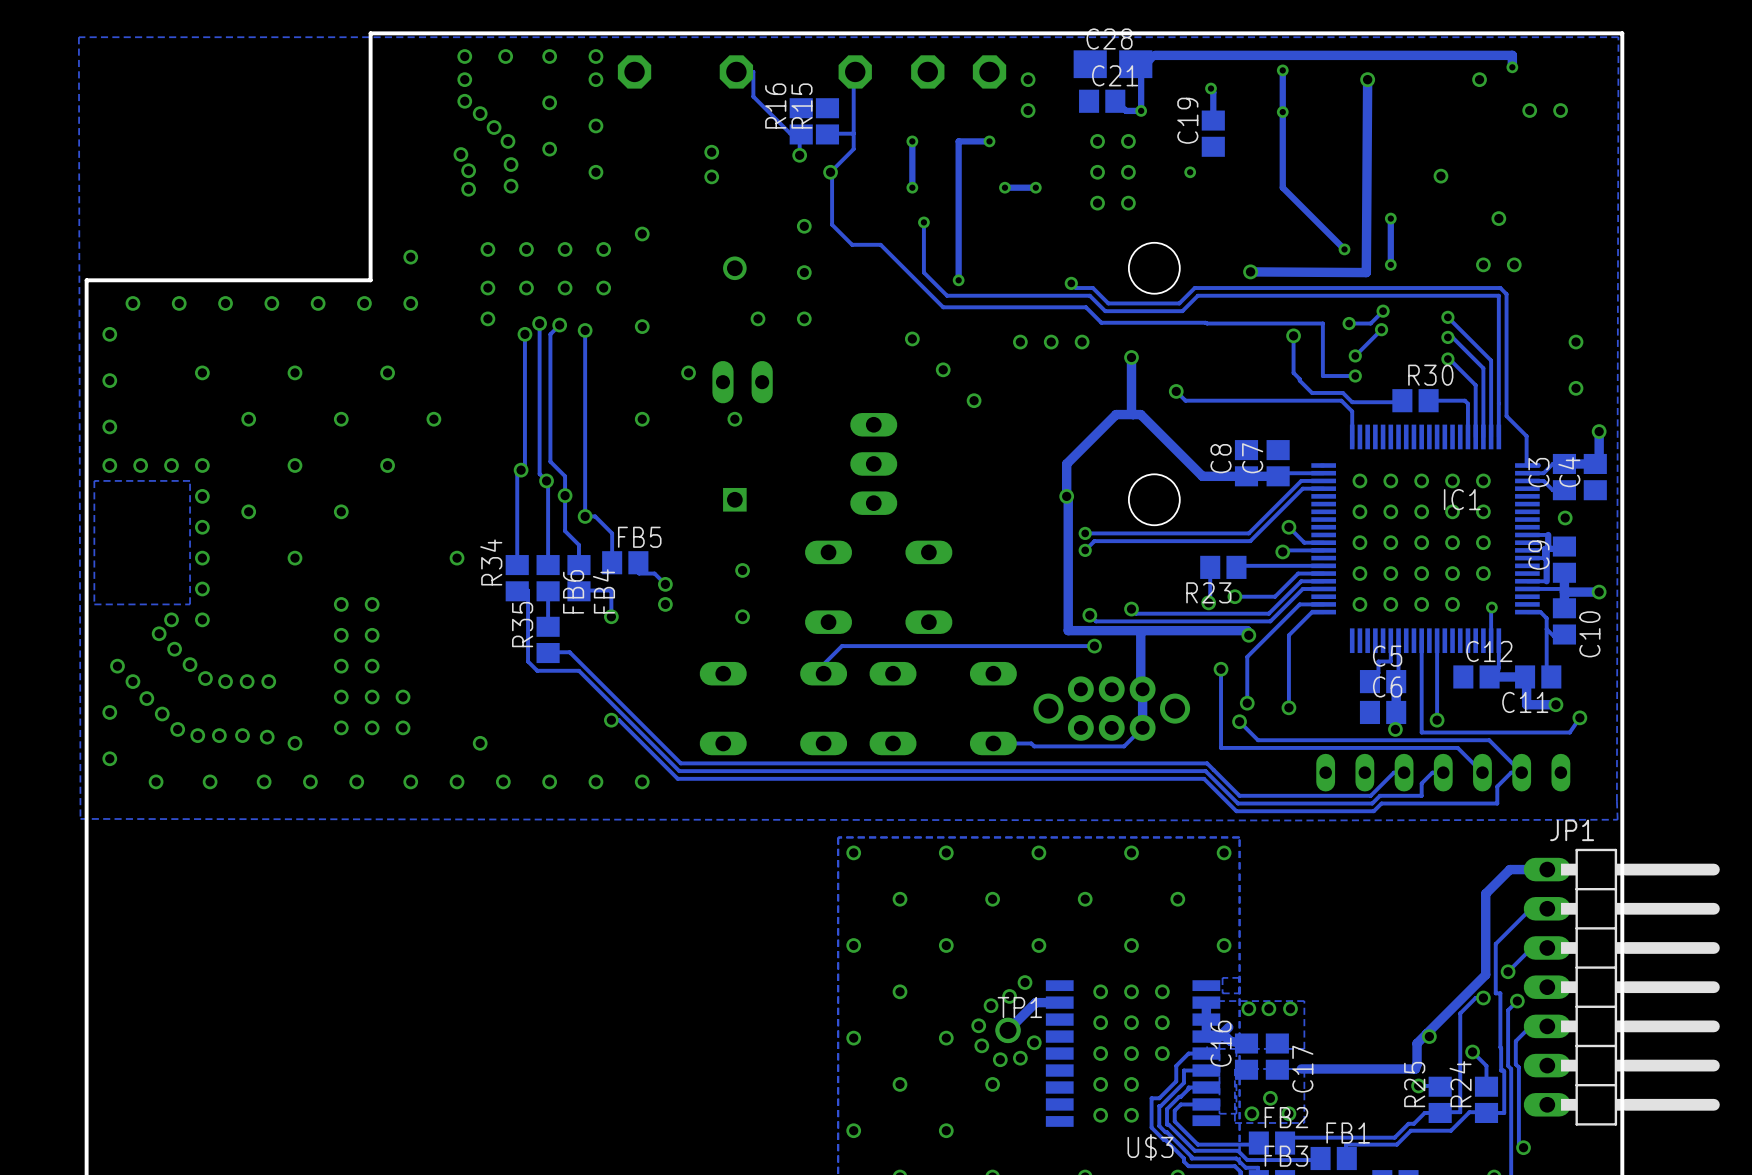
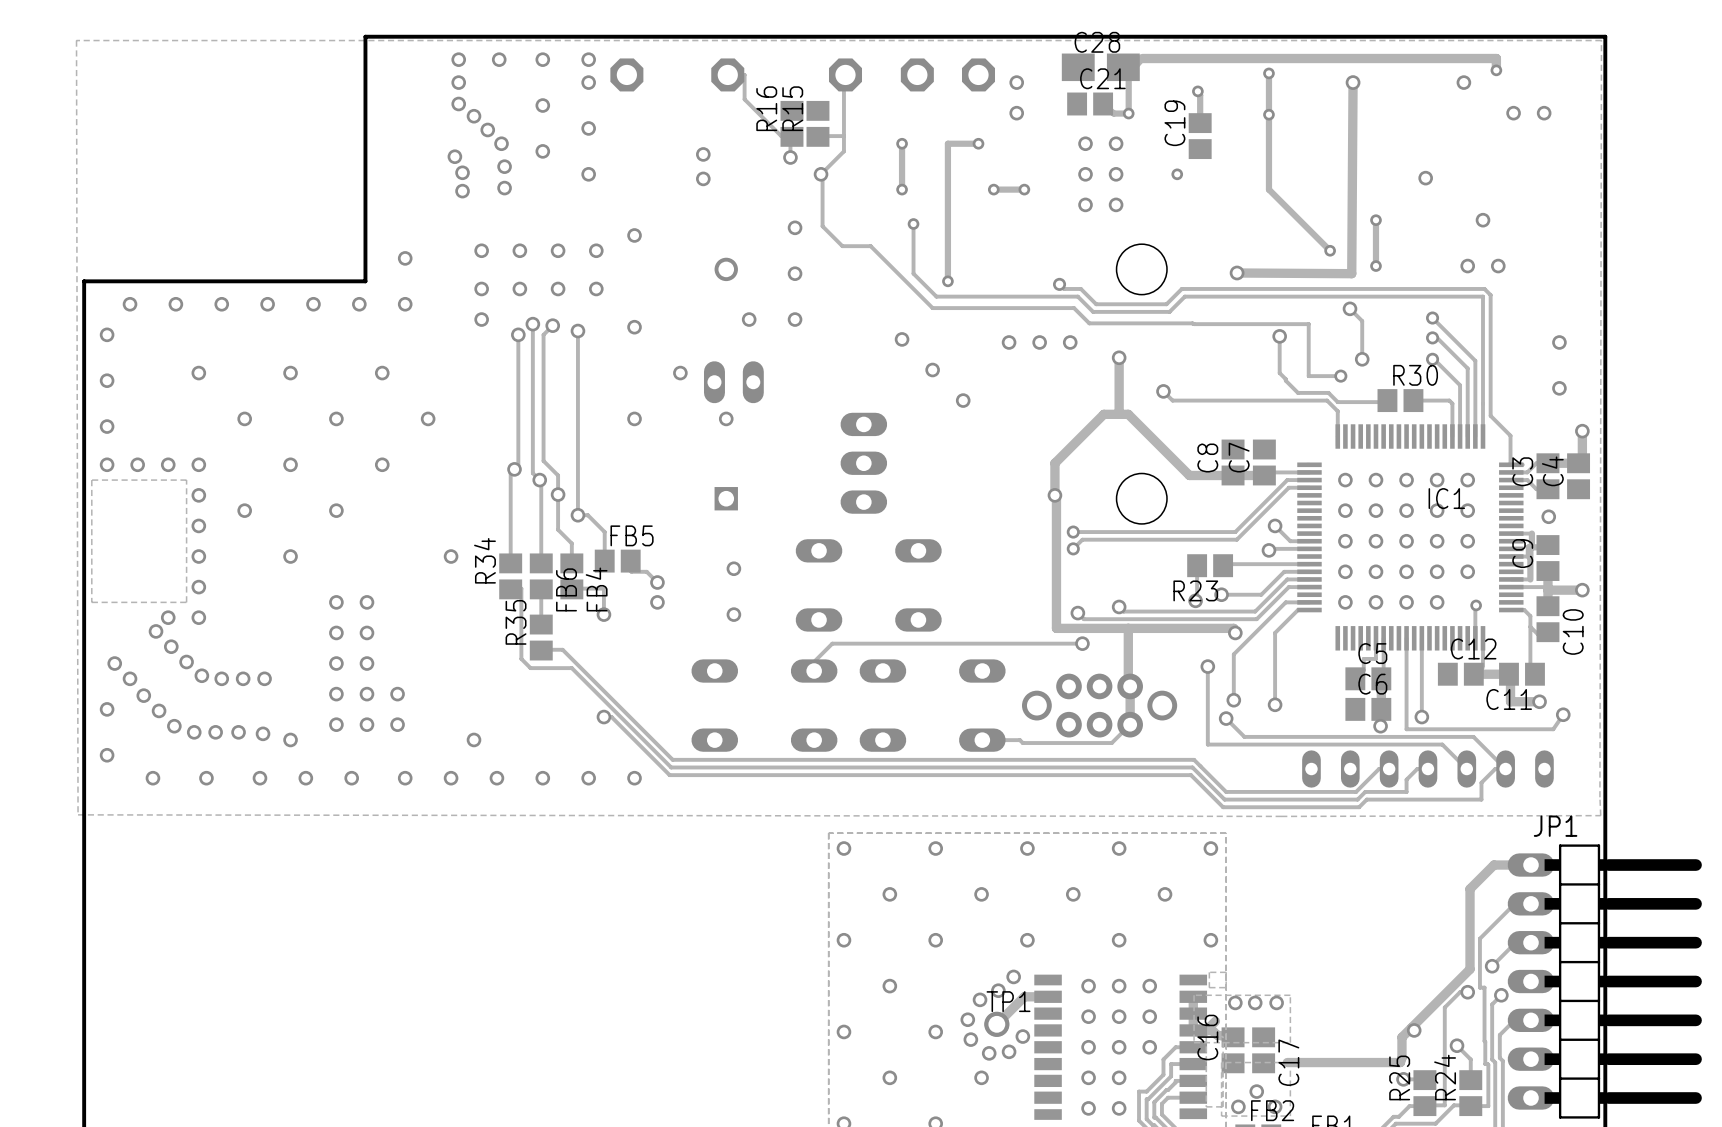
track: none -> (1349, 308) (1362, 321) (1362, 359)
via: none -> (1349, 308)
track: (1383, 311) (1370, 323) (1349, 323) -> none
via: (1383, 311) -> none
via: (1349, 323) -> none
track: (1381, 329) (1355, 355) -> none
via: (1381, 329) -> none
via: (1355, 355) -> none
via: none -> (1362, 359)

